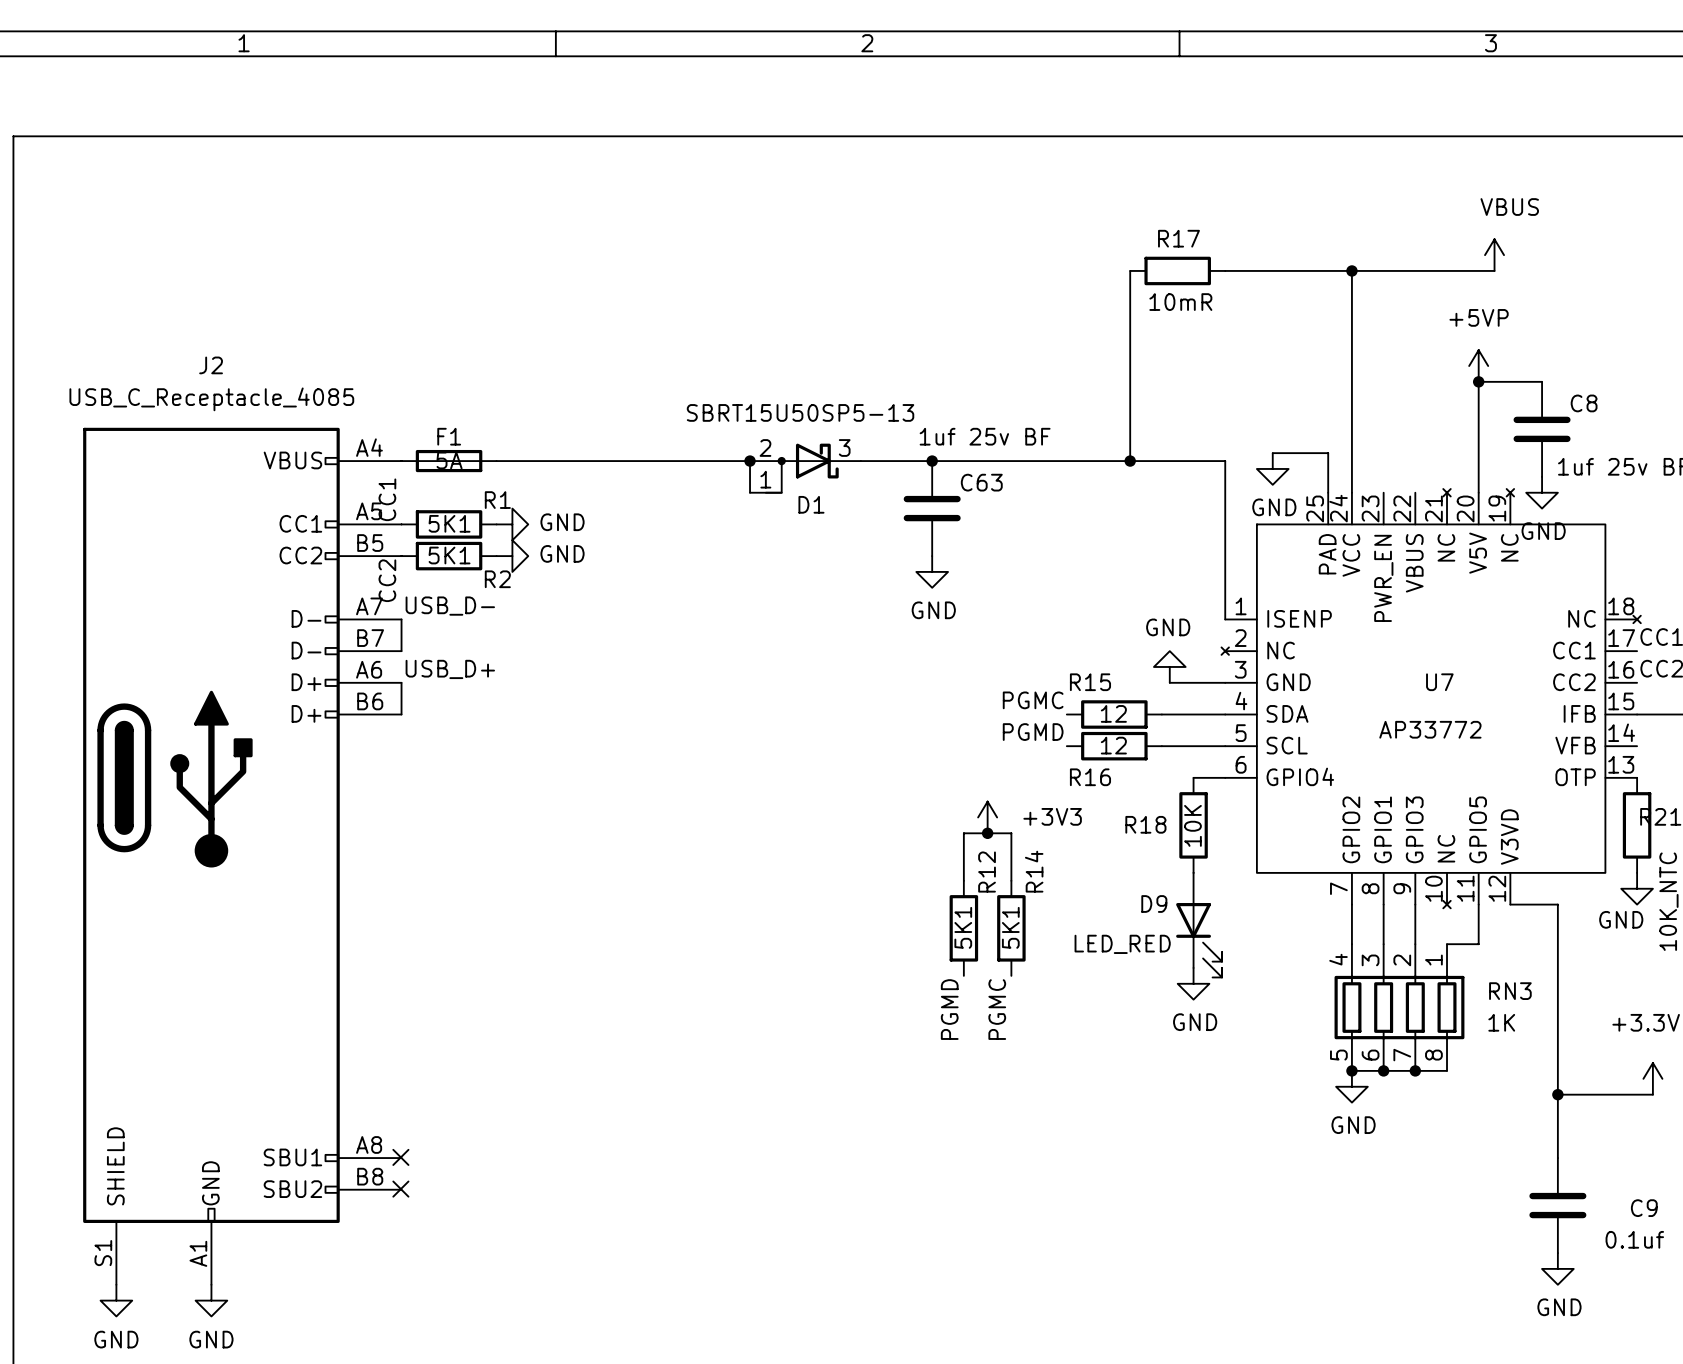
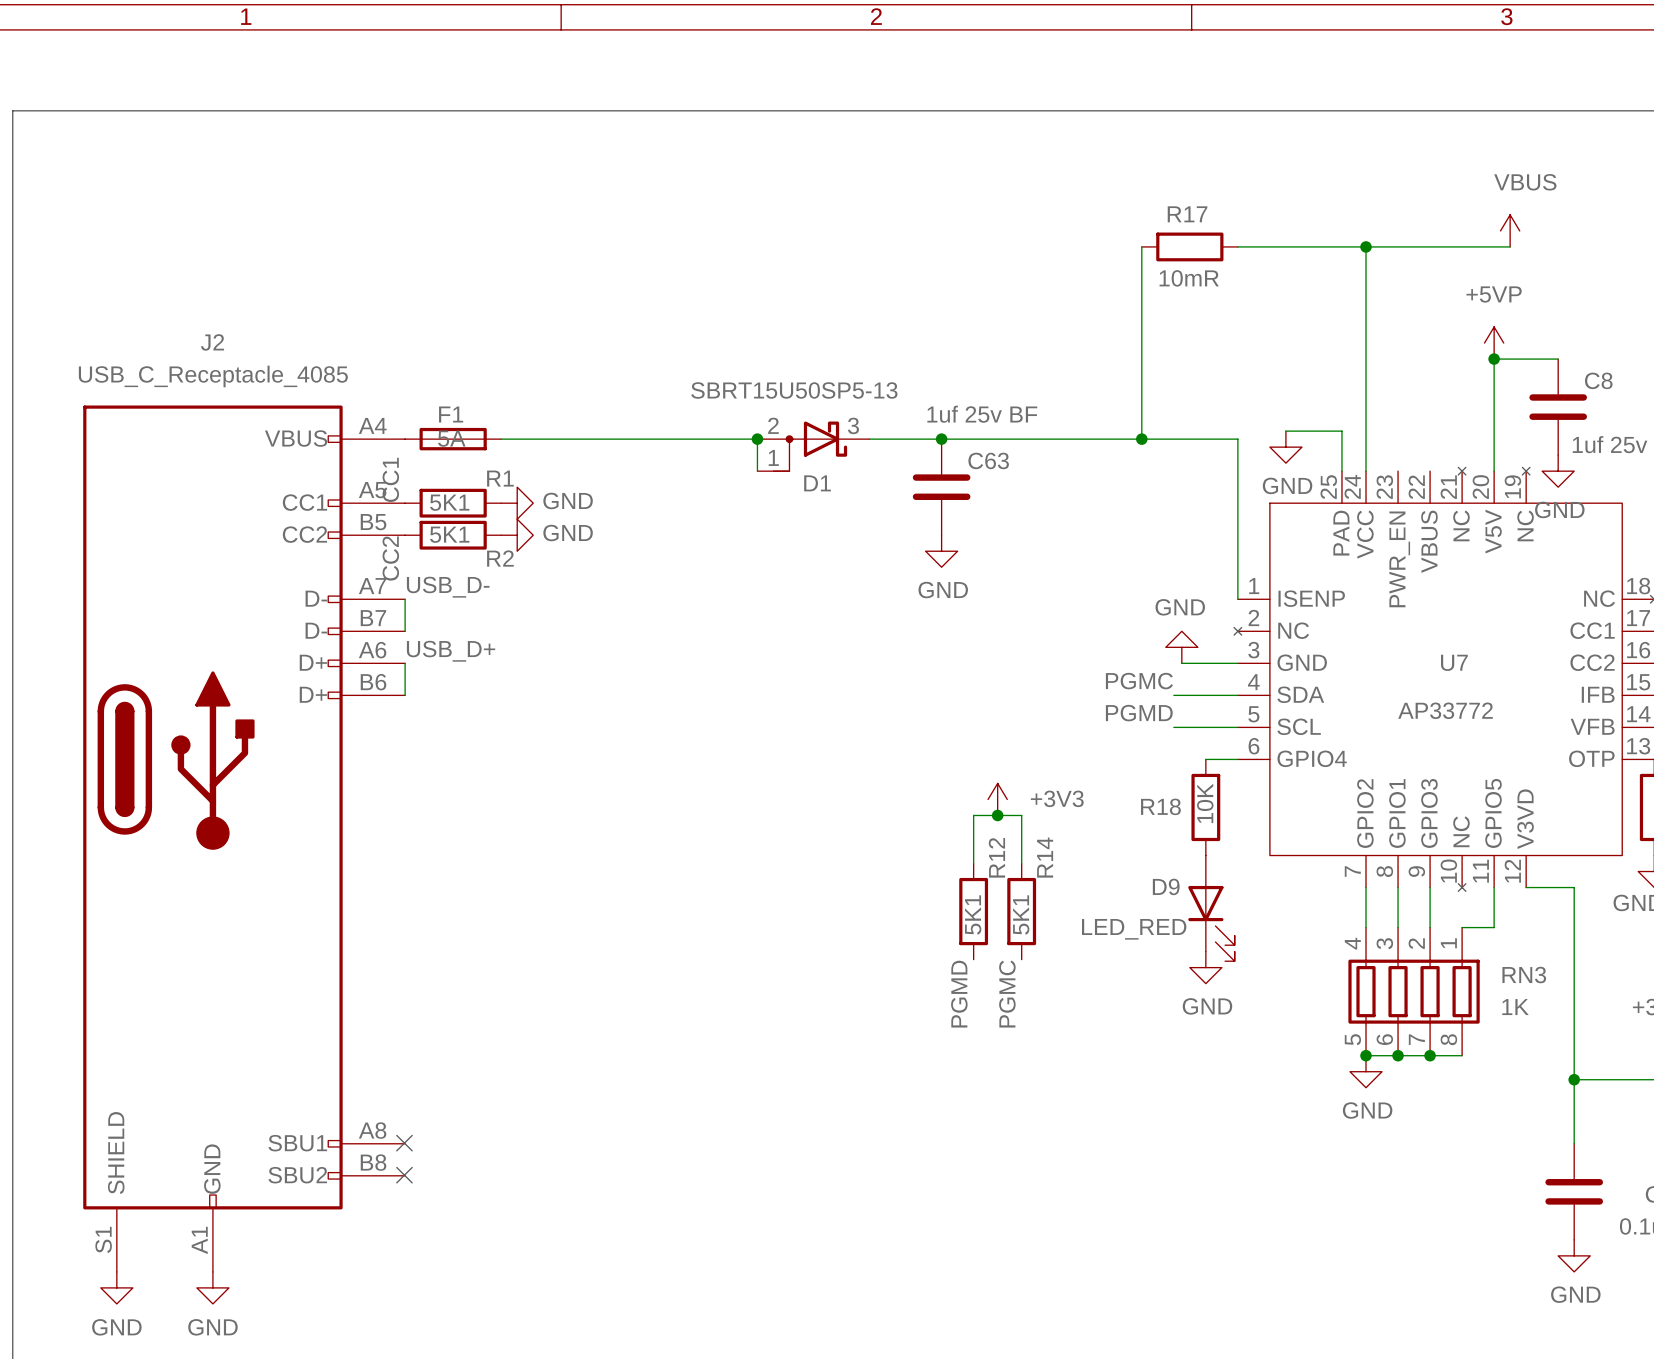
label position: PGMC (1033, 700) -> PGMC (1139, 681)
R15: 12 (1114, 714) -> none
label position: PGMD (1033, 732) -> PGMD (1139, 713)
R16: 12 (1114, 746) -> none

